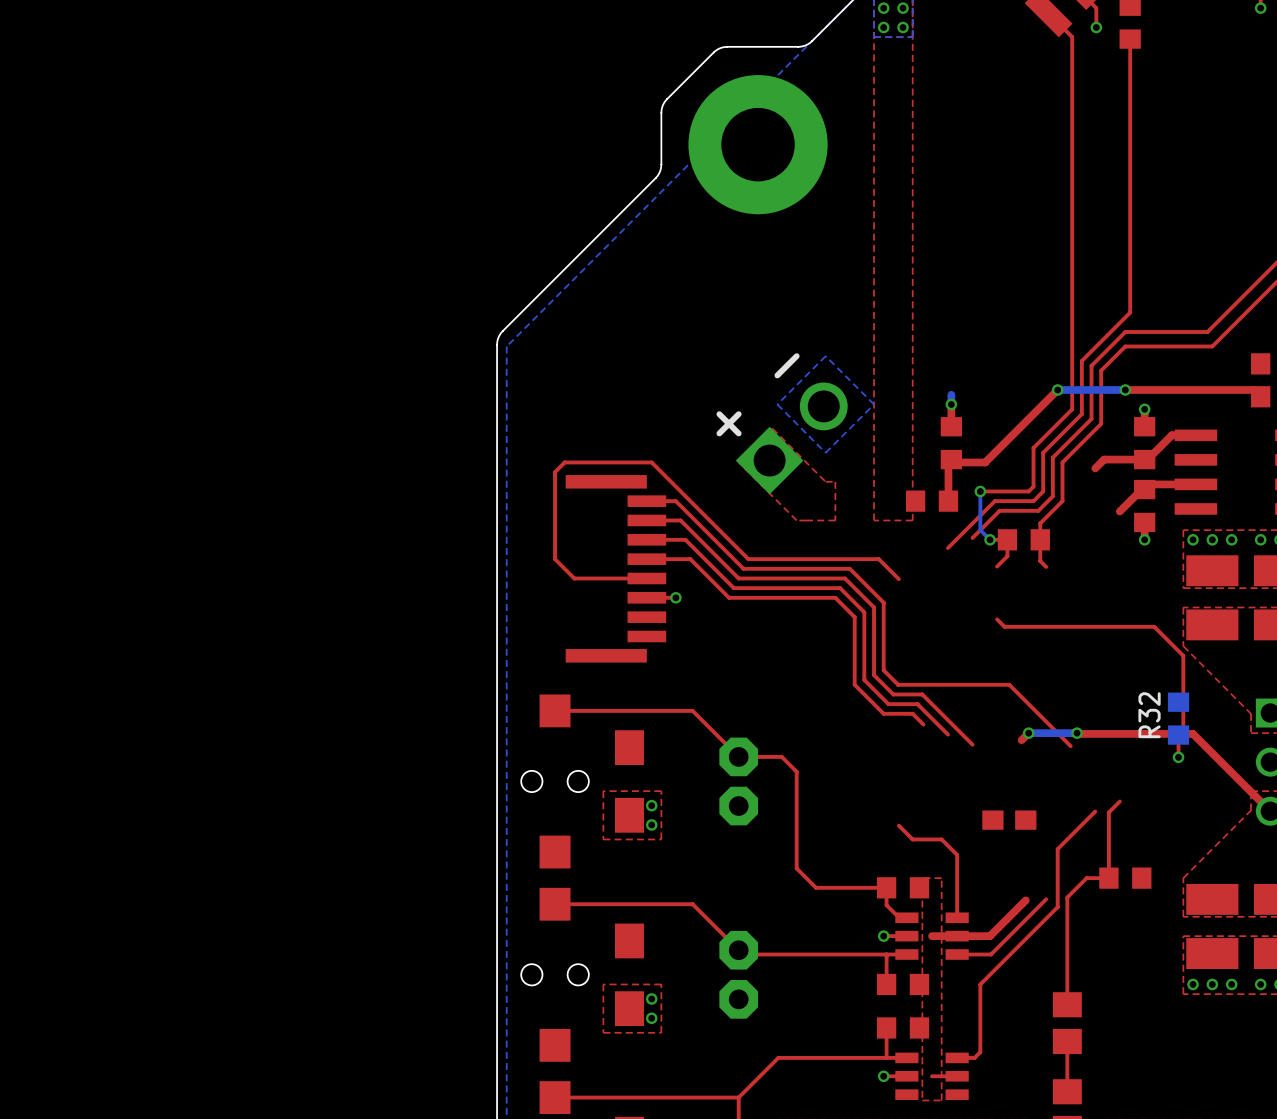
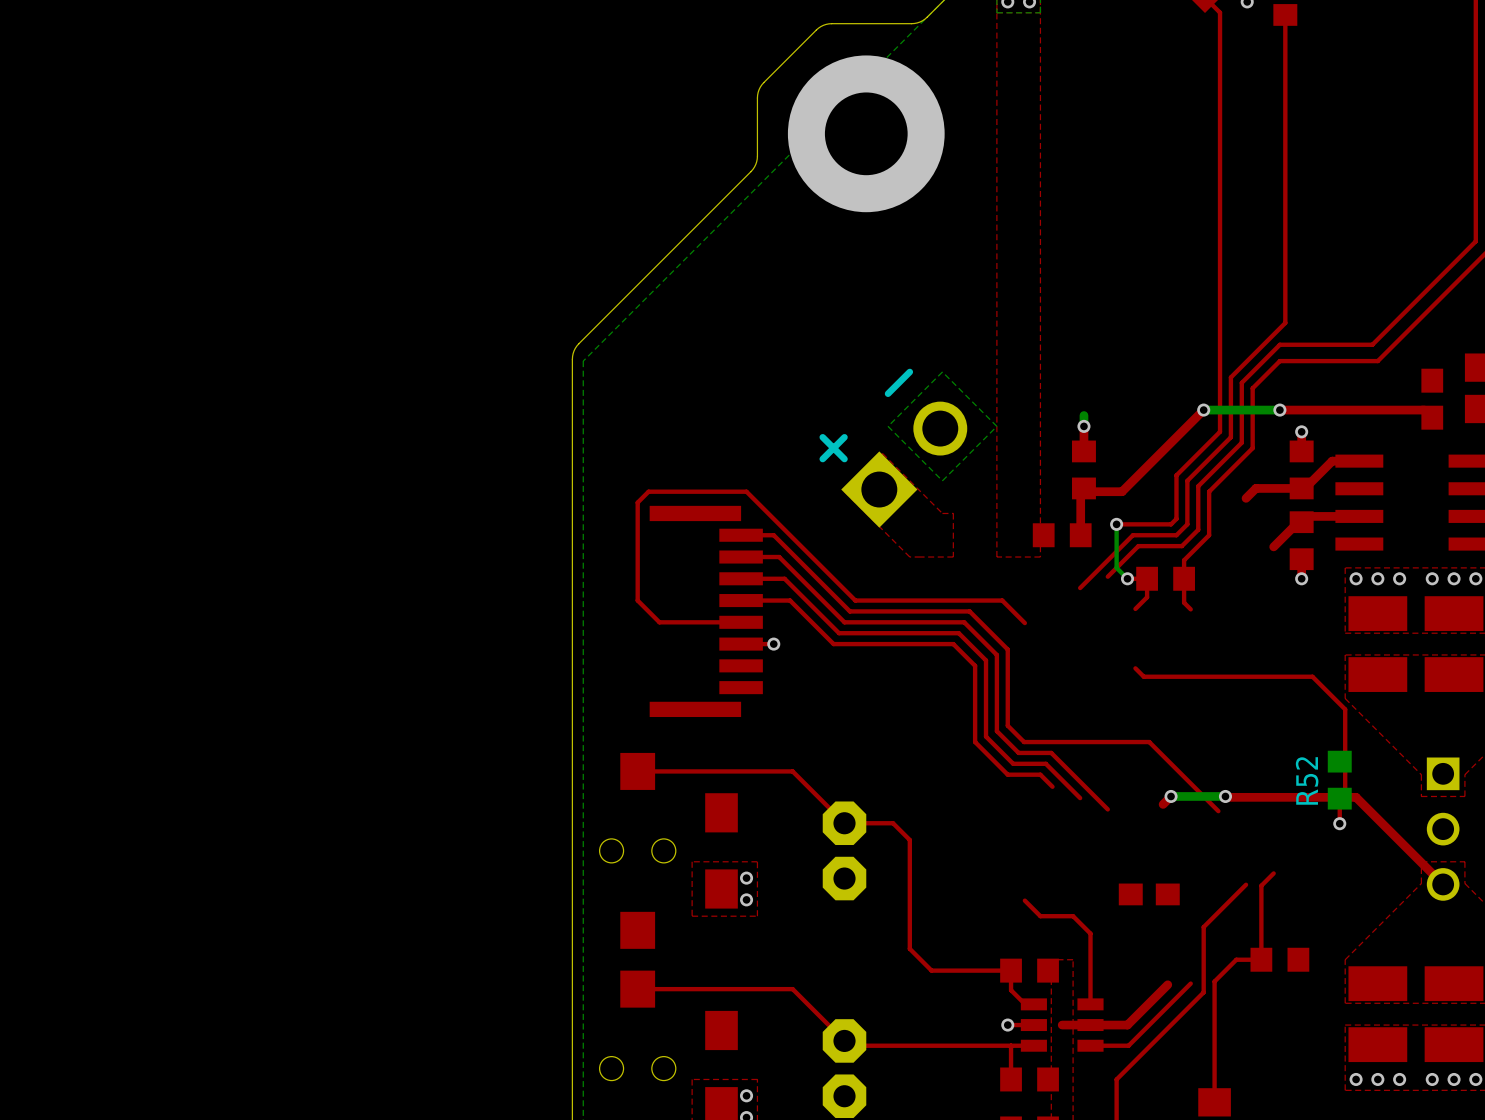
R32 name: R32 (1149, 715) -> R52 (1307, 780)

